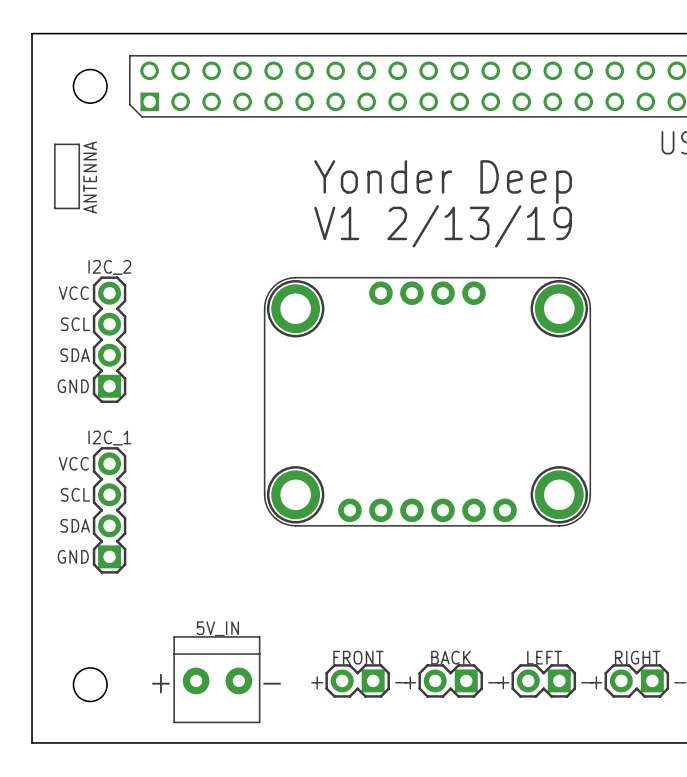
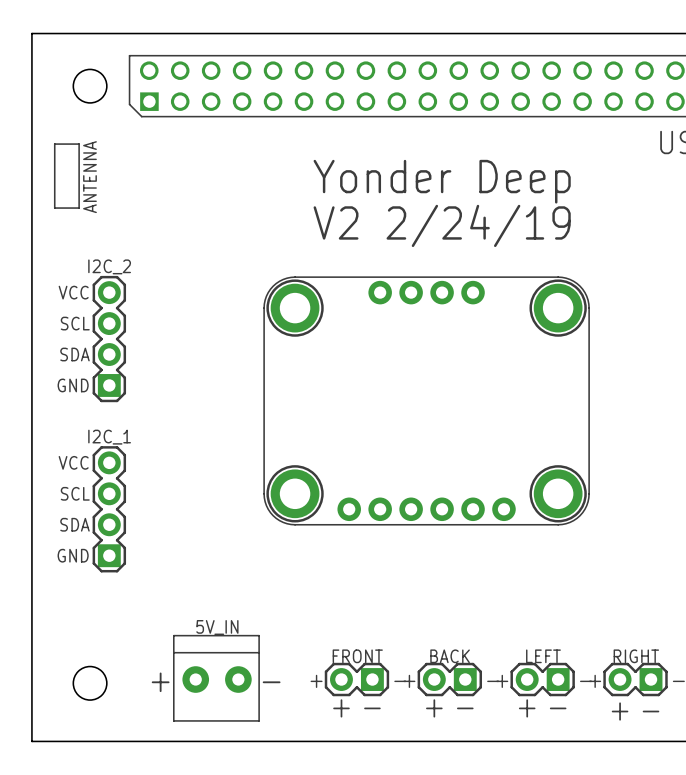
text: V1 2/13/19 (443, 226) -> V2 2/24/19 (442, 225)
text: none -> + (341, 708)
text: none -> - (372, 708)
text: none -> + (434, 708)
text: none -> - (465, 708)
text: none -> + (527, 708)
text: none -> - (558, 708)
text: none -> + (620, 711)
text: none -> - (651, 711)

